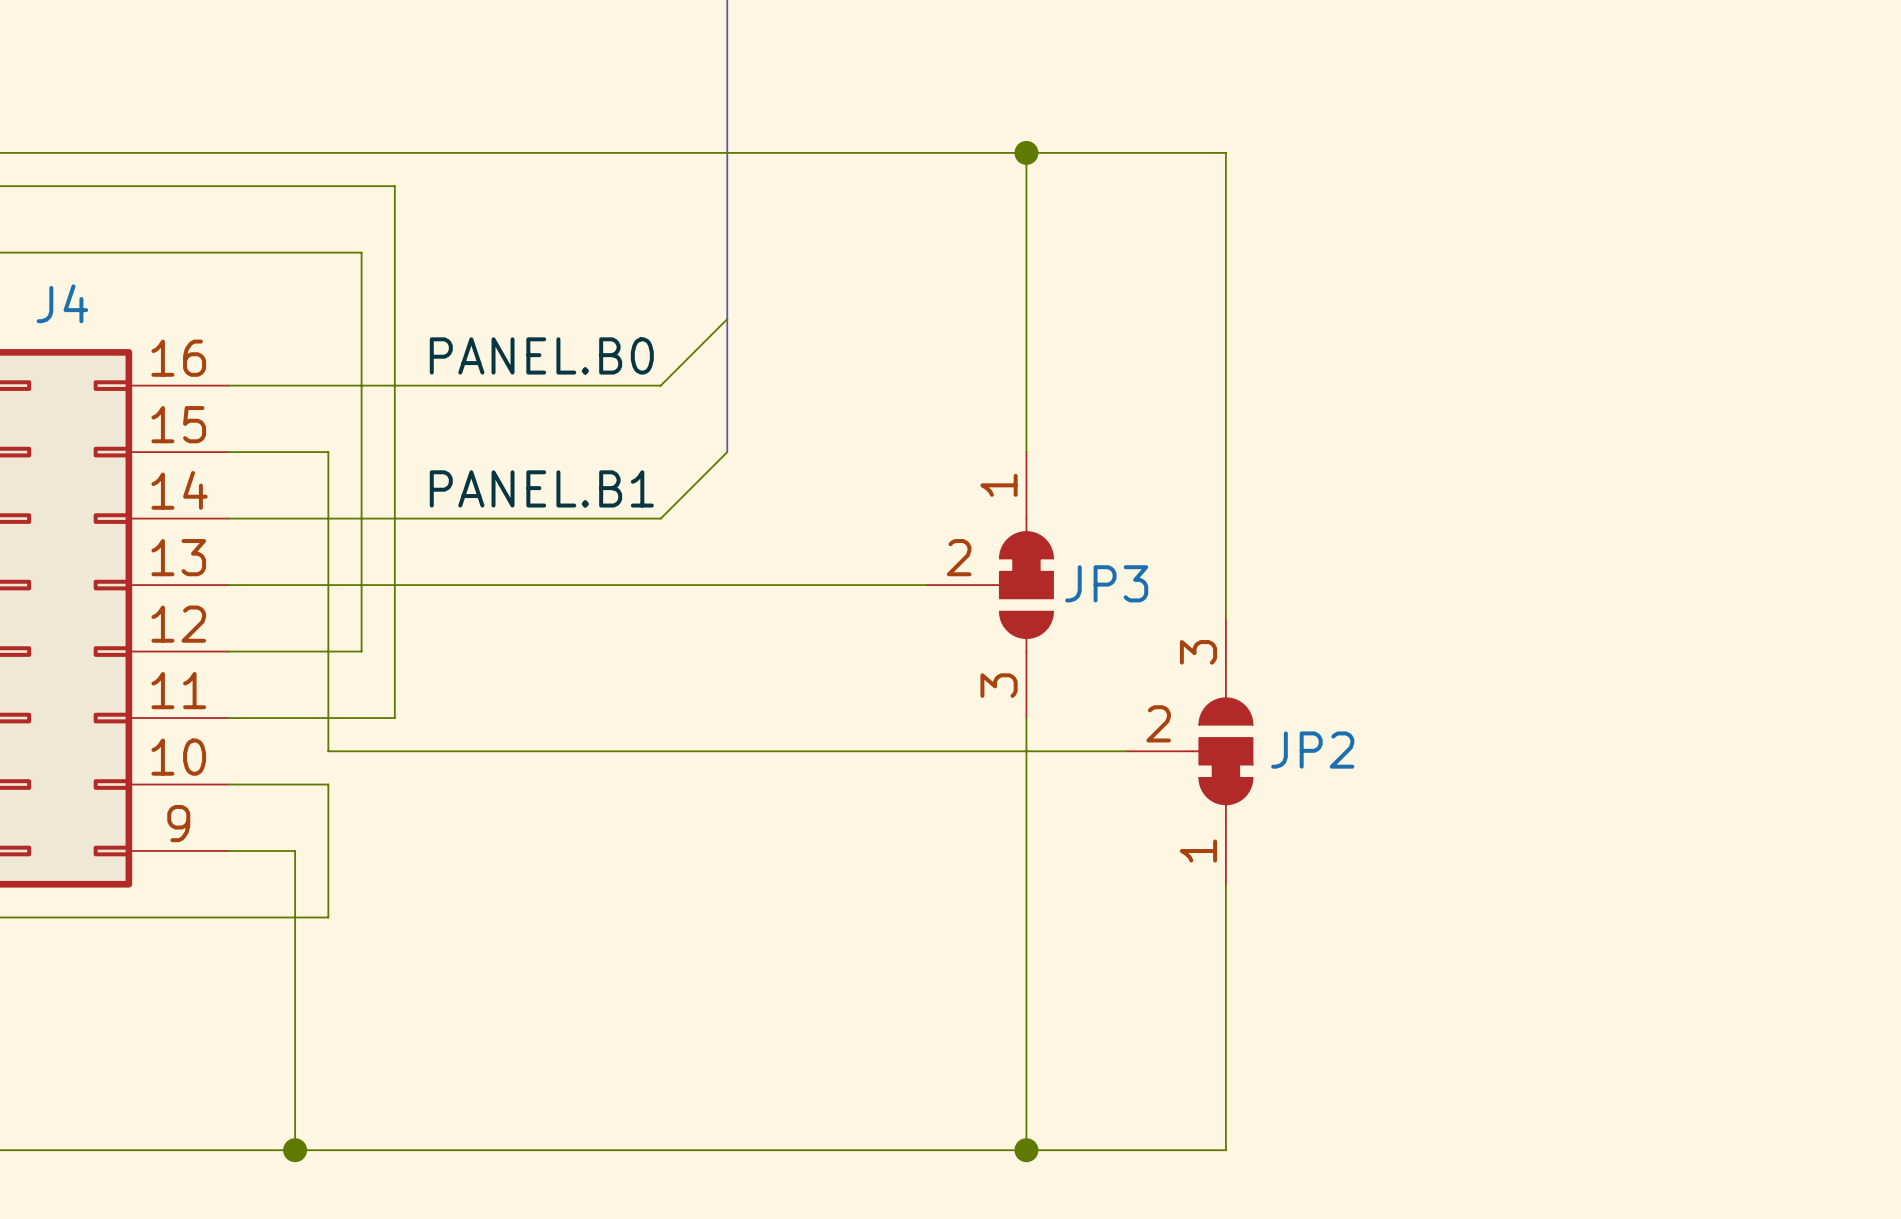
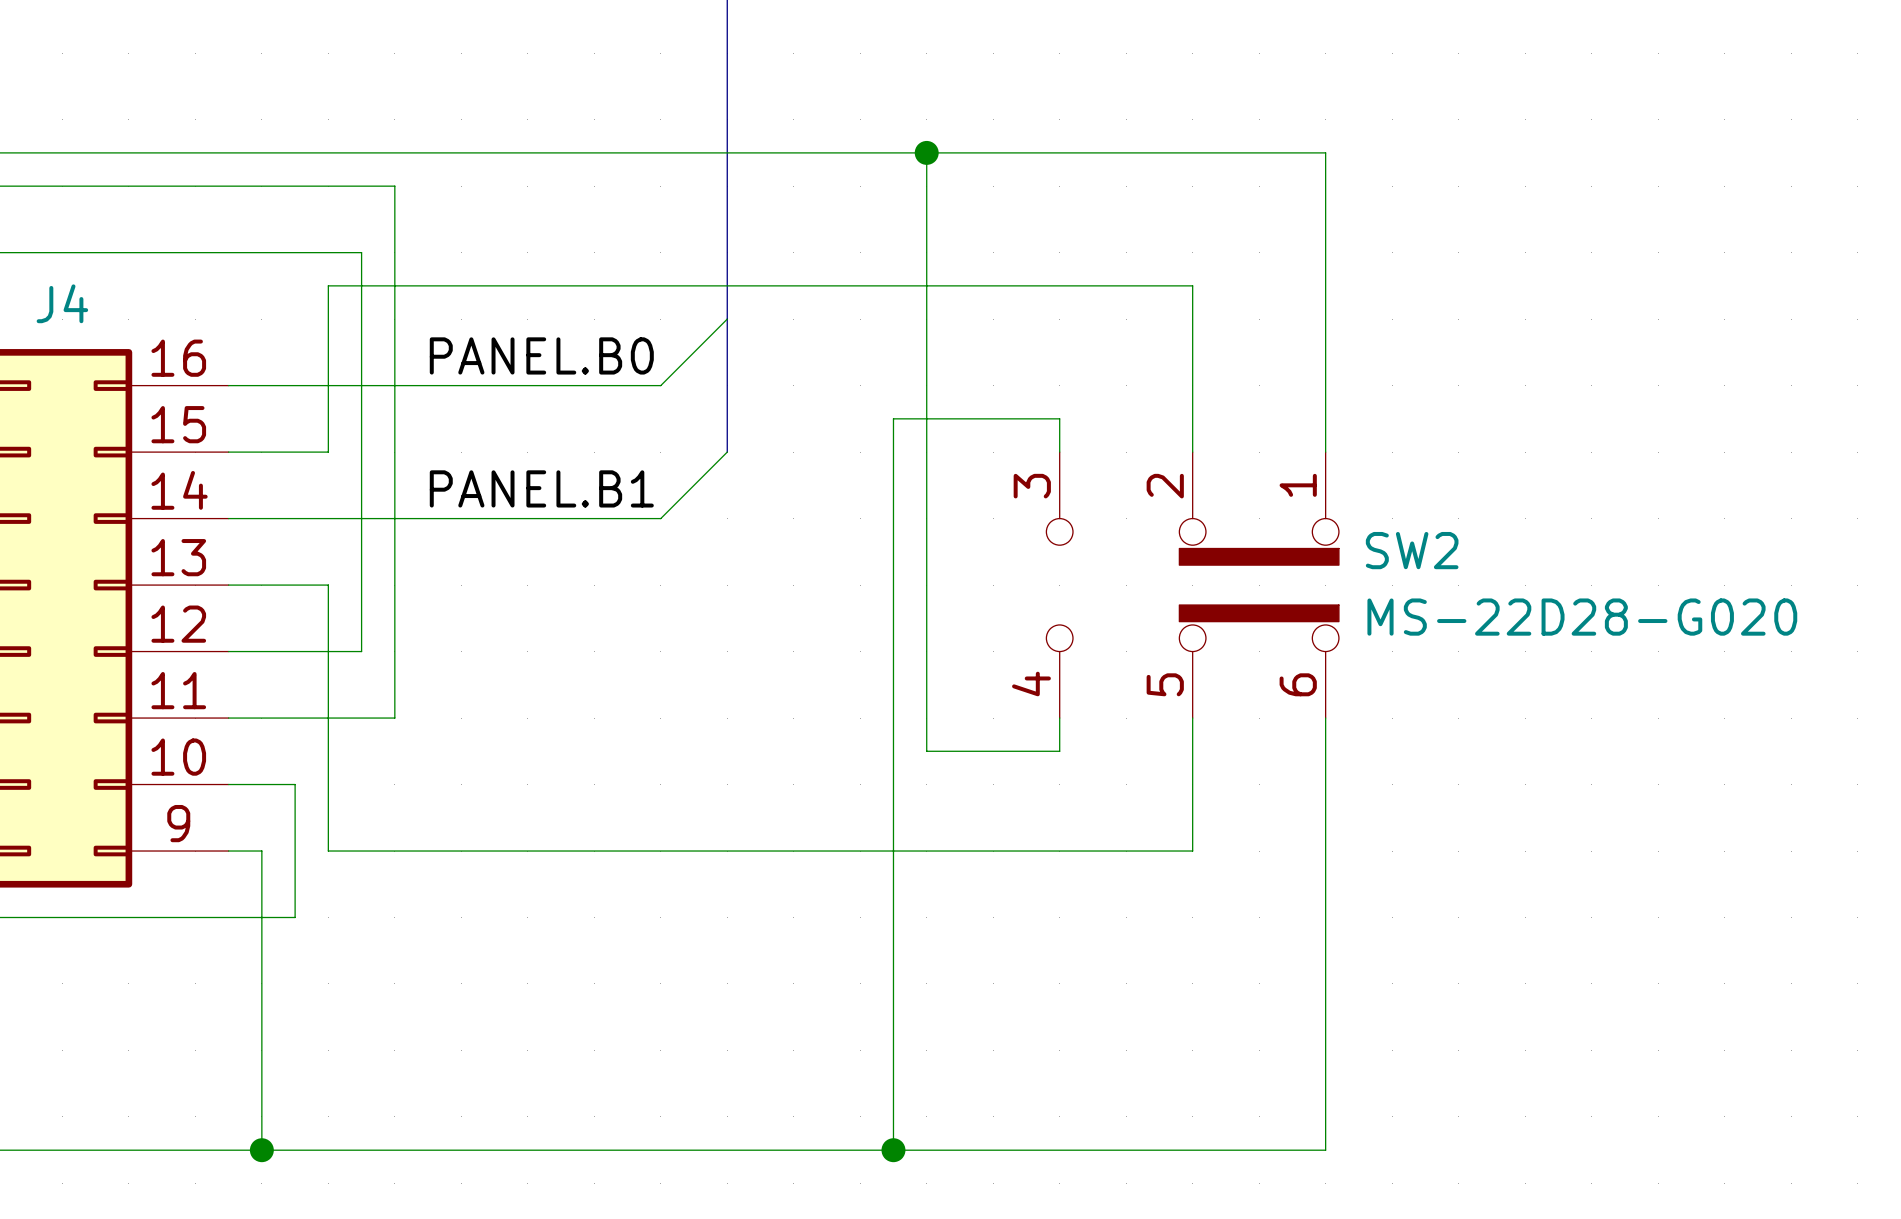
wire: (1026, 152) (1026, 452) -> none
junction position: (1026, 152) -> (926, 152)
wire: (1225, 152) (1225, 618) -> (1225, 152) (1325, 152) (1325, 452)
wire: (328, 452) (328, 585) (926, 585) -> (328, 452) (328, 285) (1192, 285) (1192, 452)
wire: none -> (1059, 452) (1059, 418) (893, 418) (893, 1150)
JP3: (989, 585) -> none
SW2: none -> MS-22D28-G020 (1192, 585)
wire: (1026, 718) (1026, 1150) -> none
wire: (328, 751) (926, 751) -> (926, 152) (926, 751)
wire: (1059, 751) (1126, 751) -> (1059, 751) (1059, 718)
JP2: (1189, 751) -> none
wire: (295, 784) (328, 784) -> (328, 751) (328, 784)
wire: (261, 851) (295, 851) -> (295, 784) (295, 851)
wire: none -> (261, 851) (261, 1150)
wire: (328, 851) (328, 917) (295, 917) (295, 1150) -> (328, 851) (1192, 851) (1192, 718)
wire: (1225, 884) (1225, 1150) -> (1325, 718) (1325, 1150) (1225, 1150)
junction position: (295, 1150) -> (261, 1150)
junction position: (1026, 1150) -> (893, 1150)

